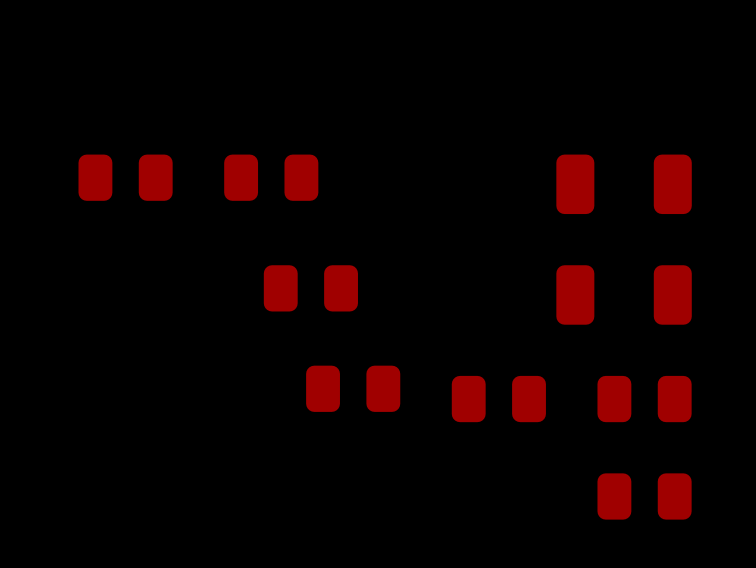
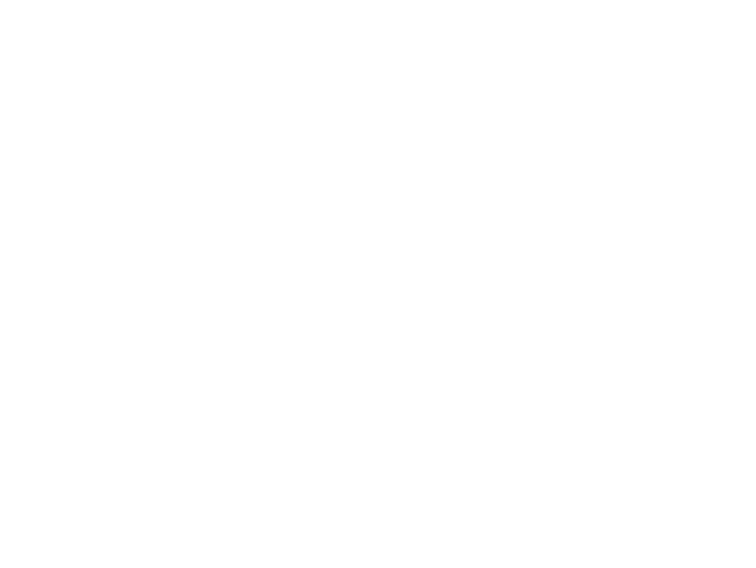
part: (125, 177) -> none
part: (271, 177) -> none
part: (624, 184) -> none
part: (310, 288) -> none
part: (624, 294) -> none
part: (353, 388) -> none
part: (498, 399) -> none
part: (644, 399) -> none
part: (644, 496) -> none

